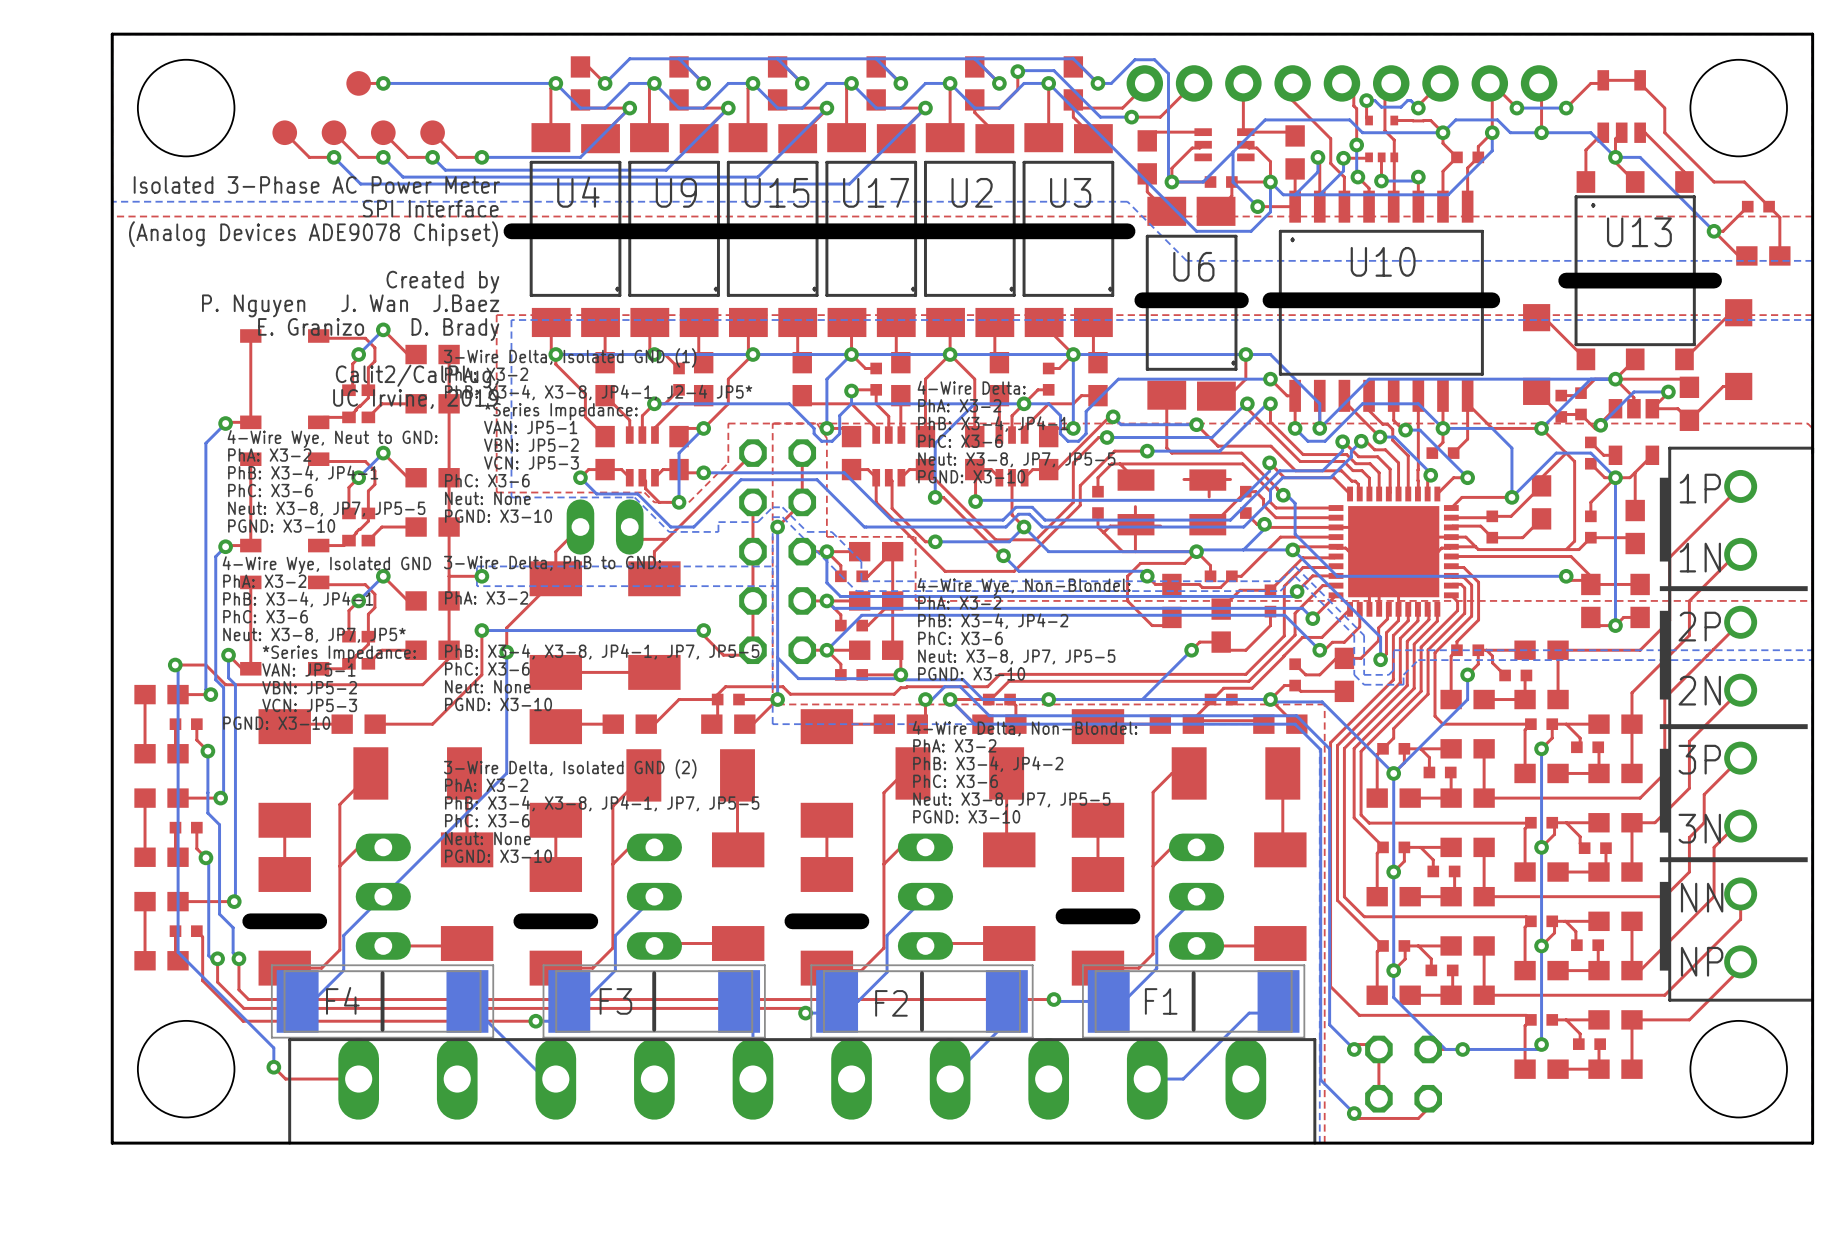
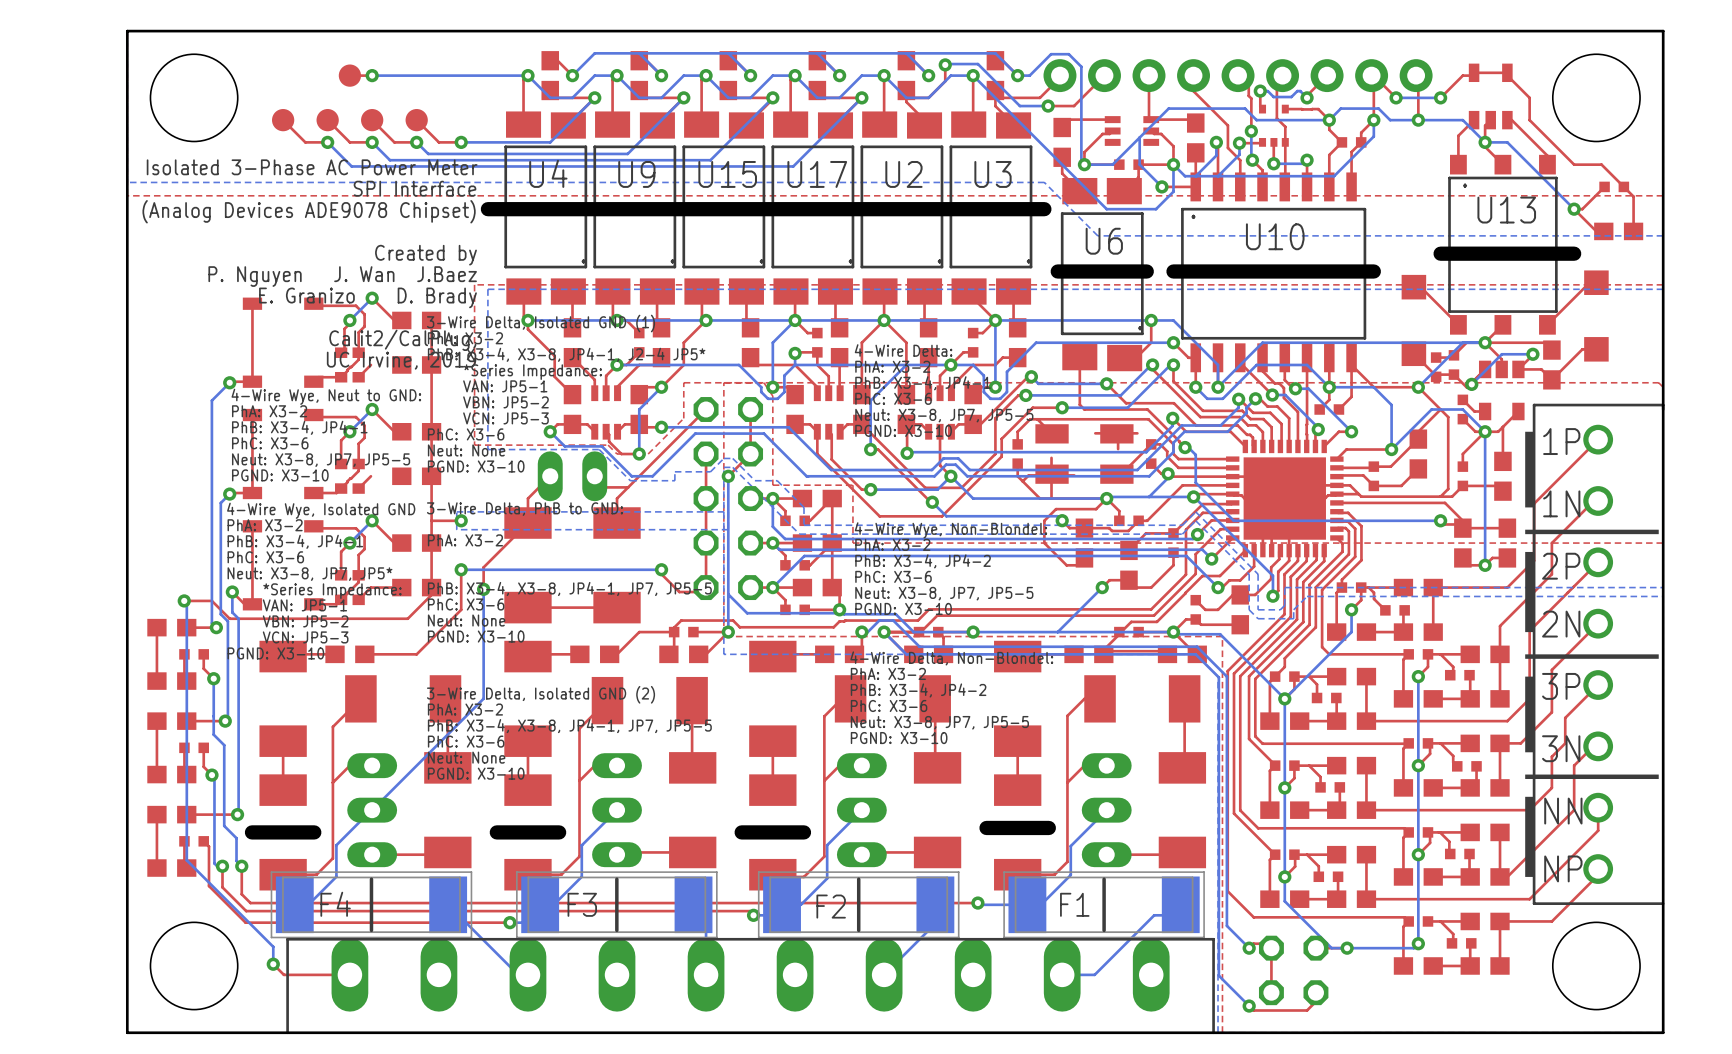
top track: (416, 403) (381, 403) -> none
top track: (416, 527) (381, 527) -> none

